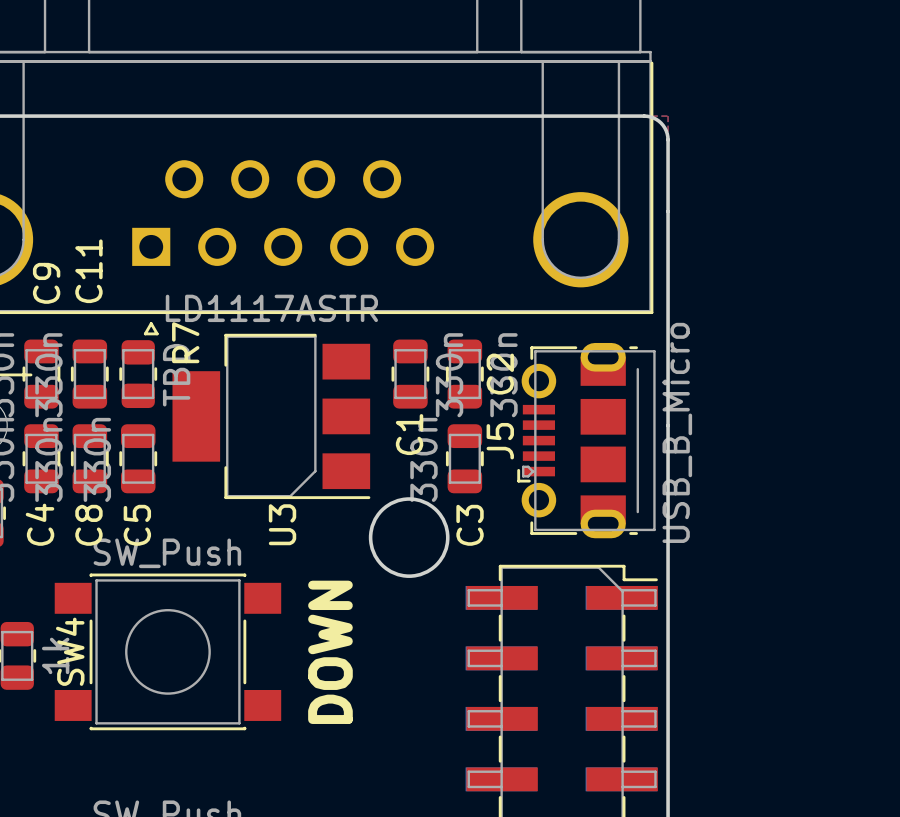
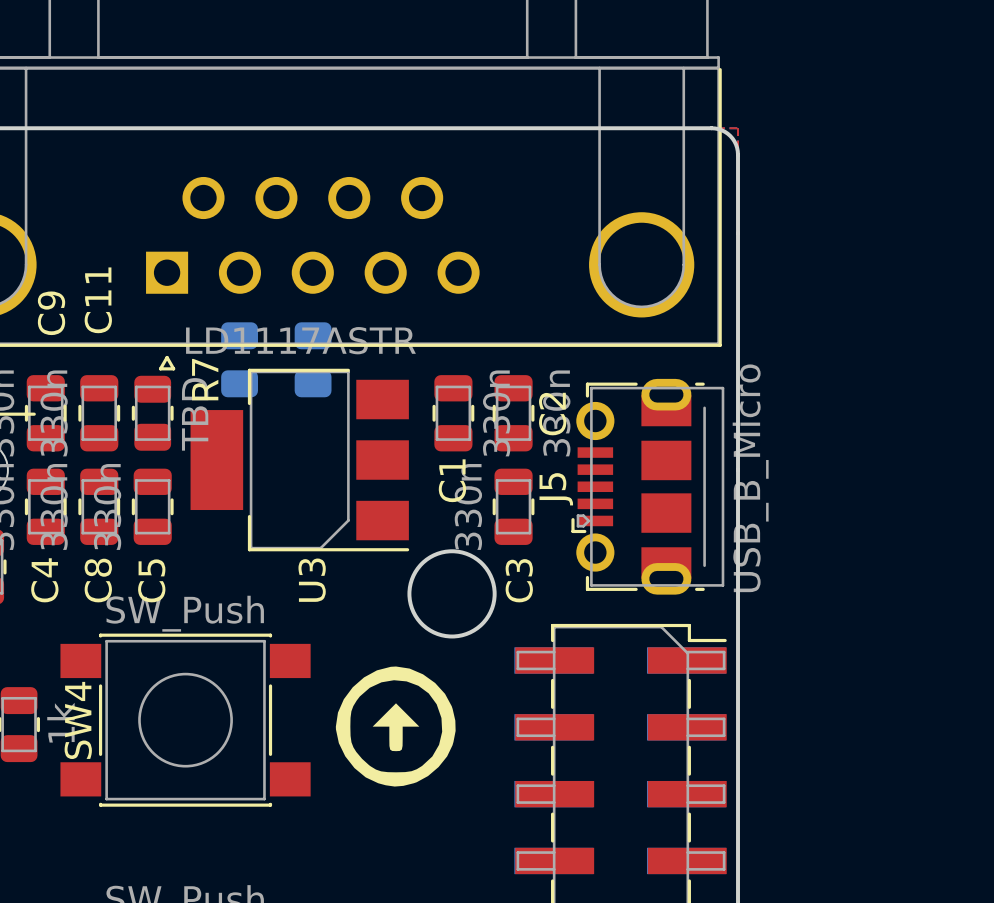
part: none -> (239, 359)
part: none -> (313, 359)
drawing: none -> [335, 666, 456, 787]
text: DOWN (330, 652) -> none

